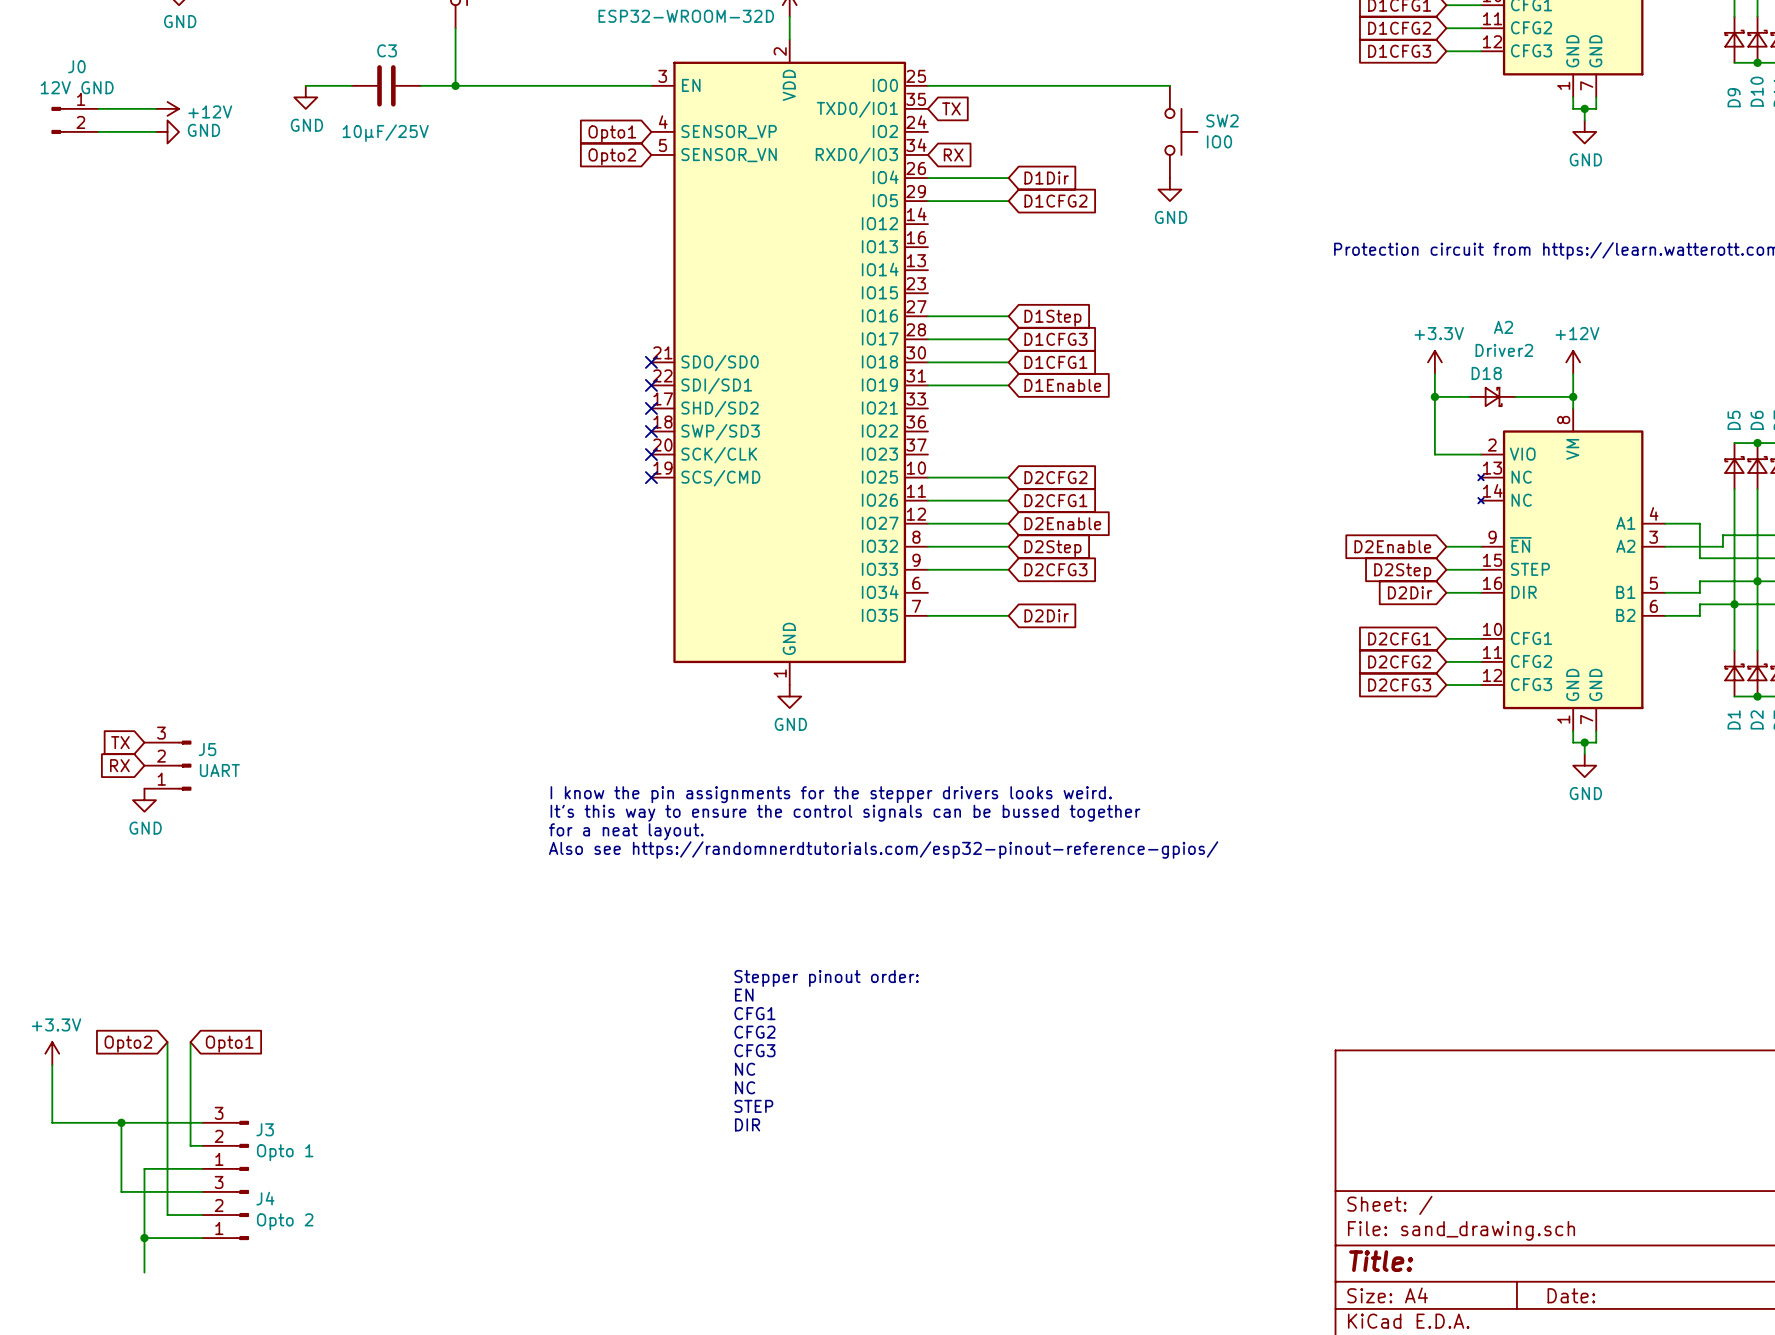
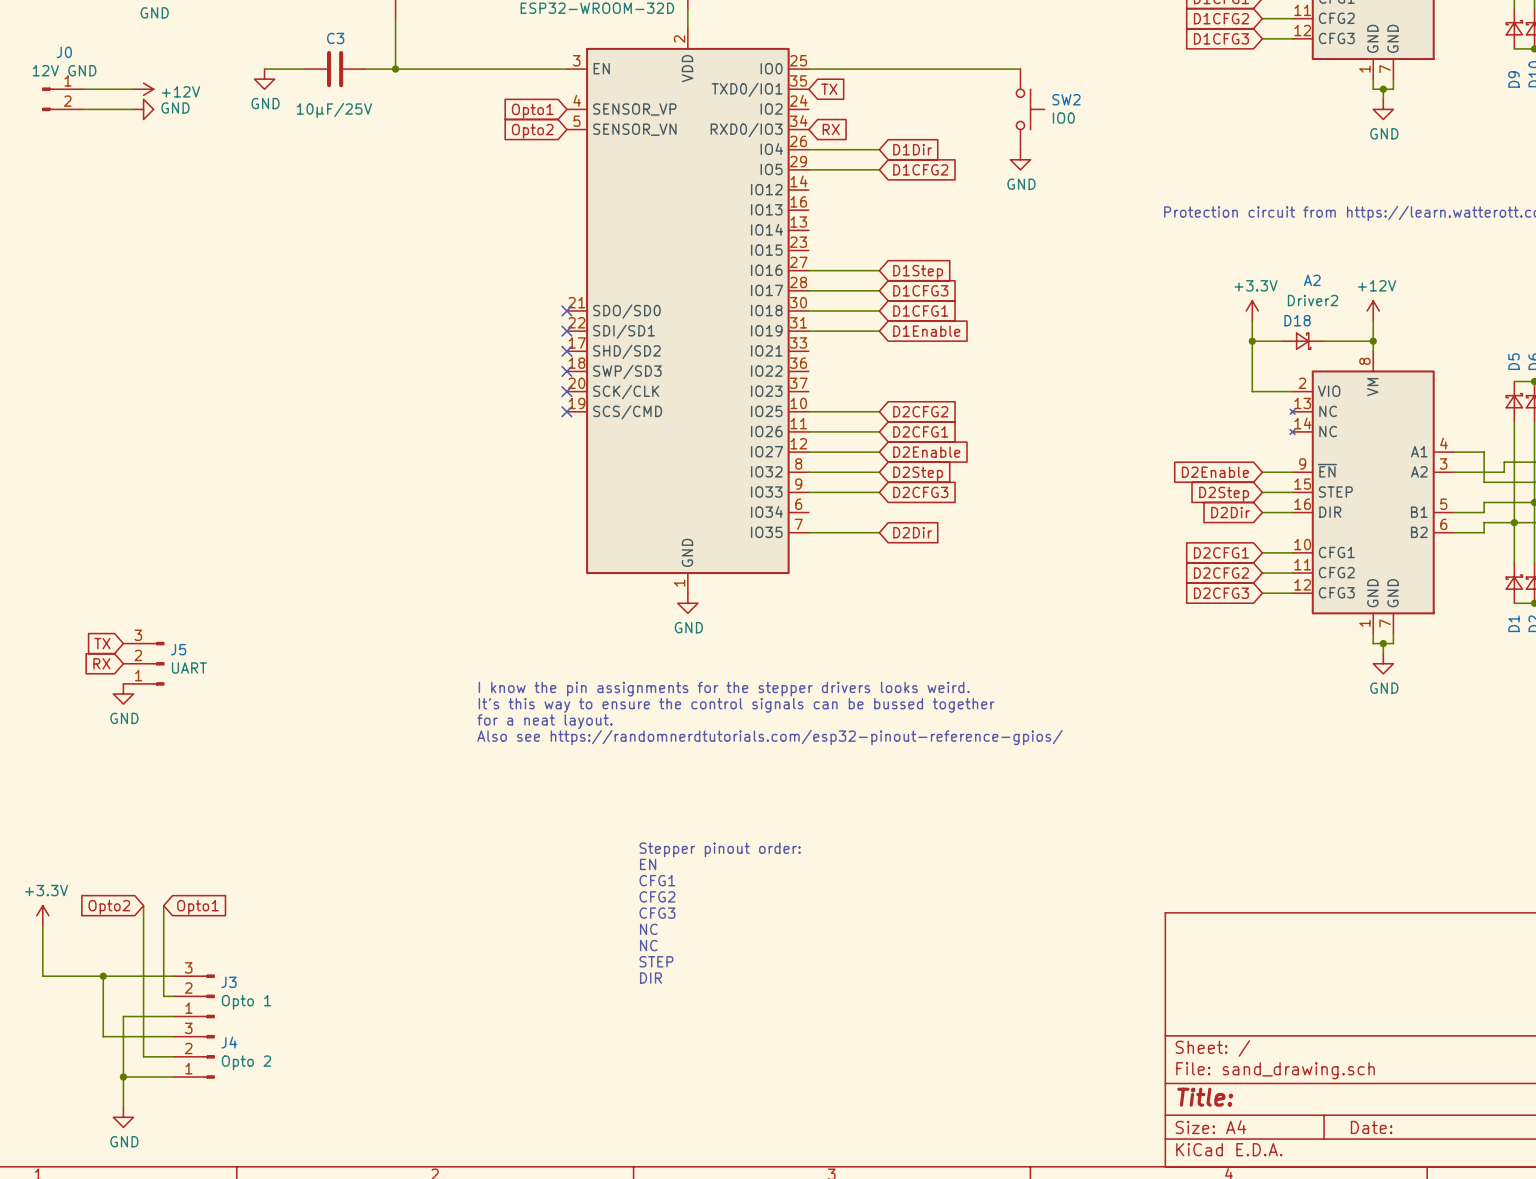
power symbol: none -> GND (123, 1117)

